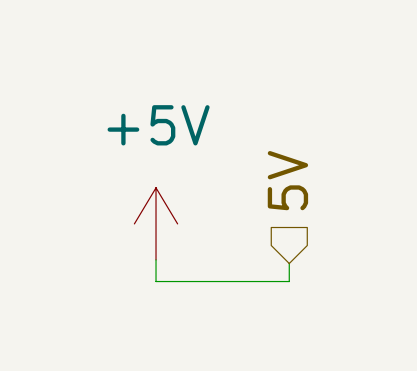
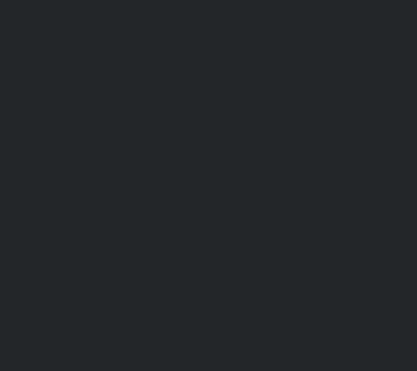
hierarchical label: 5V (287, 180) -> none
power symbol: +5V (156, 223) -> none
wire: (156, 259) (156, 281) (289, 281) (289, 263) -> none

